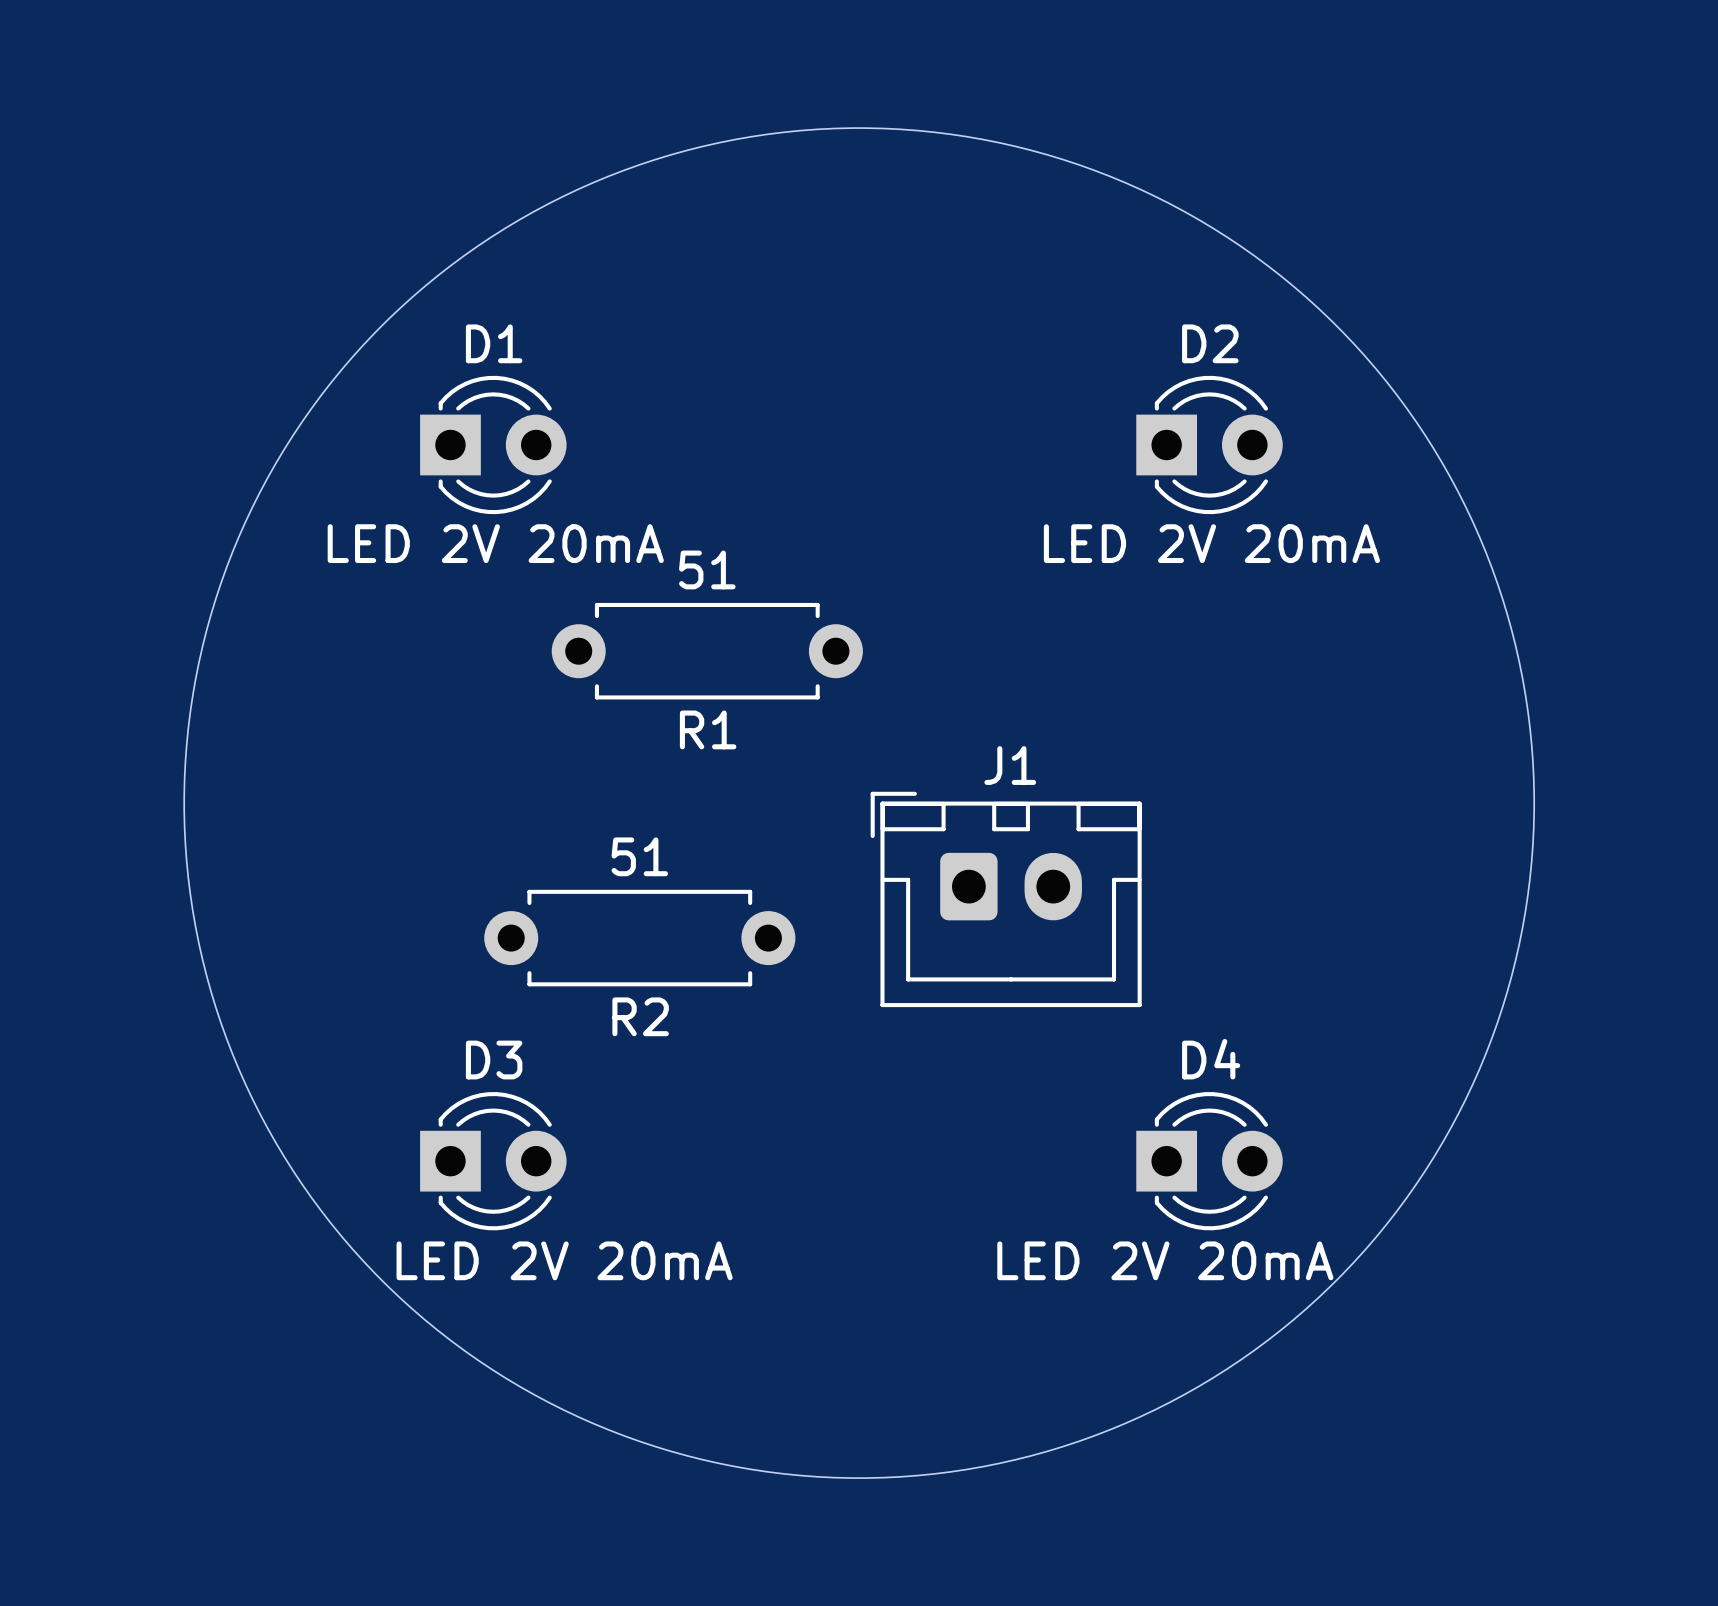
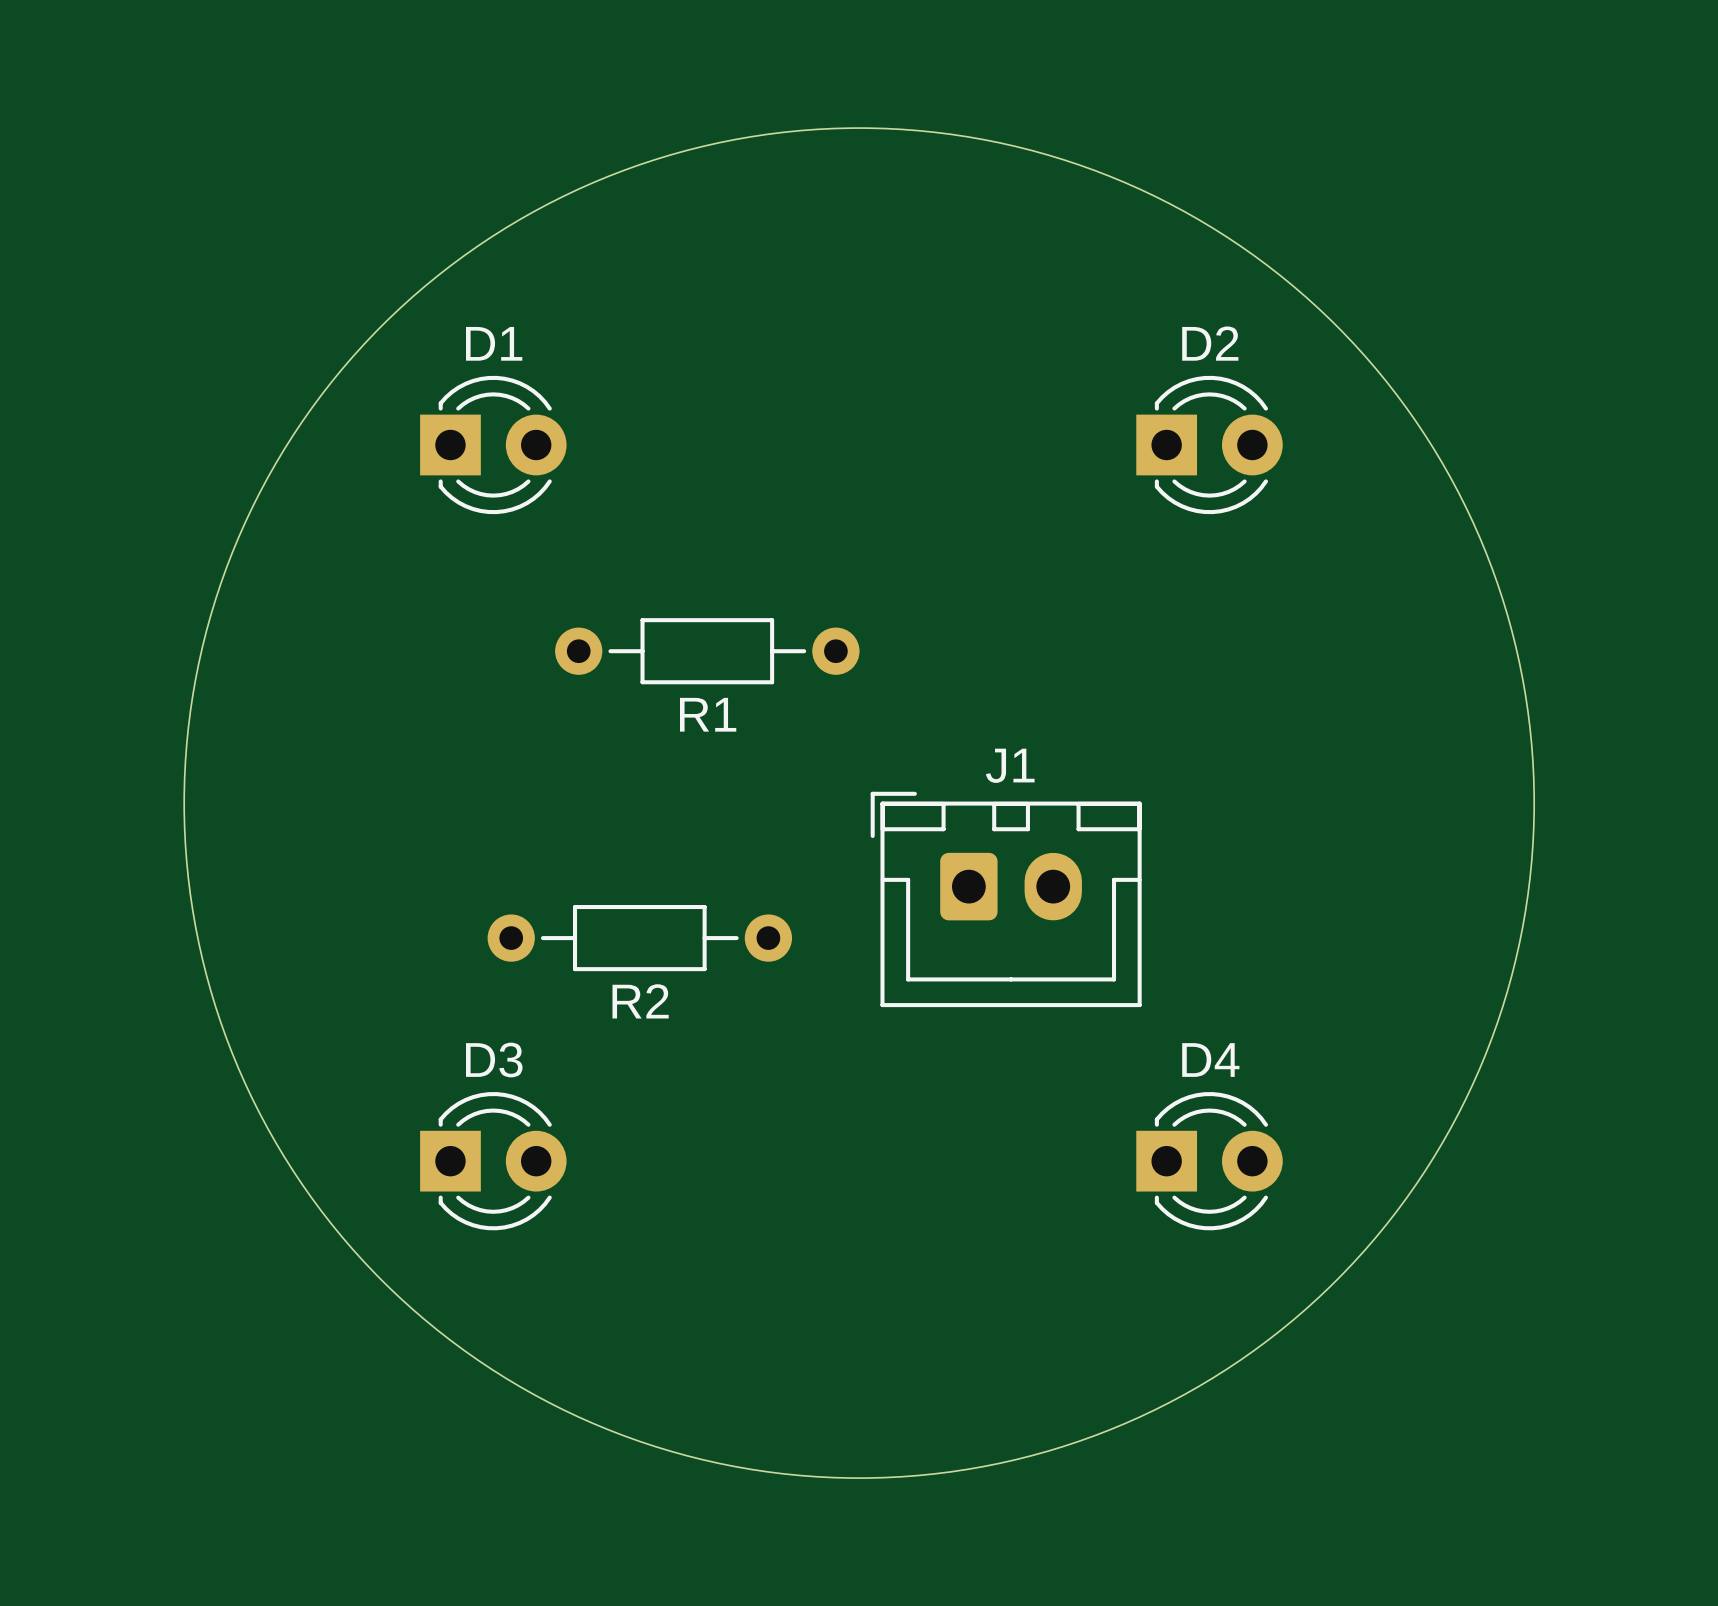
D1 value: LED 2V 20mA (495, 543) -> none
D2 value: LED 2V 20mA (1211, 543) -> none
R1 value: 51 (707, 569) -> none
R1 footprint: [551, 602, 863, 700] -> [555, 618, 860, 685]
R2 value: 51 (639, 856) -> none
R2 footprint: [484, 889, 796, 987] -> [487, 905, 793, 972]
D3 value: LED 2V 20mA (564, 1260) -> none
D4 value: LED 2V 20mA (1165, 1260) -> none

